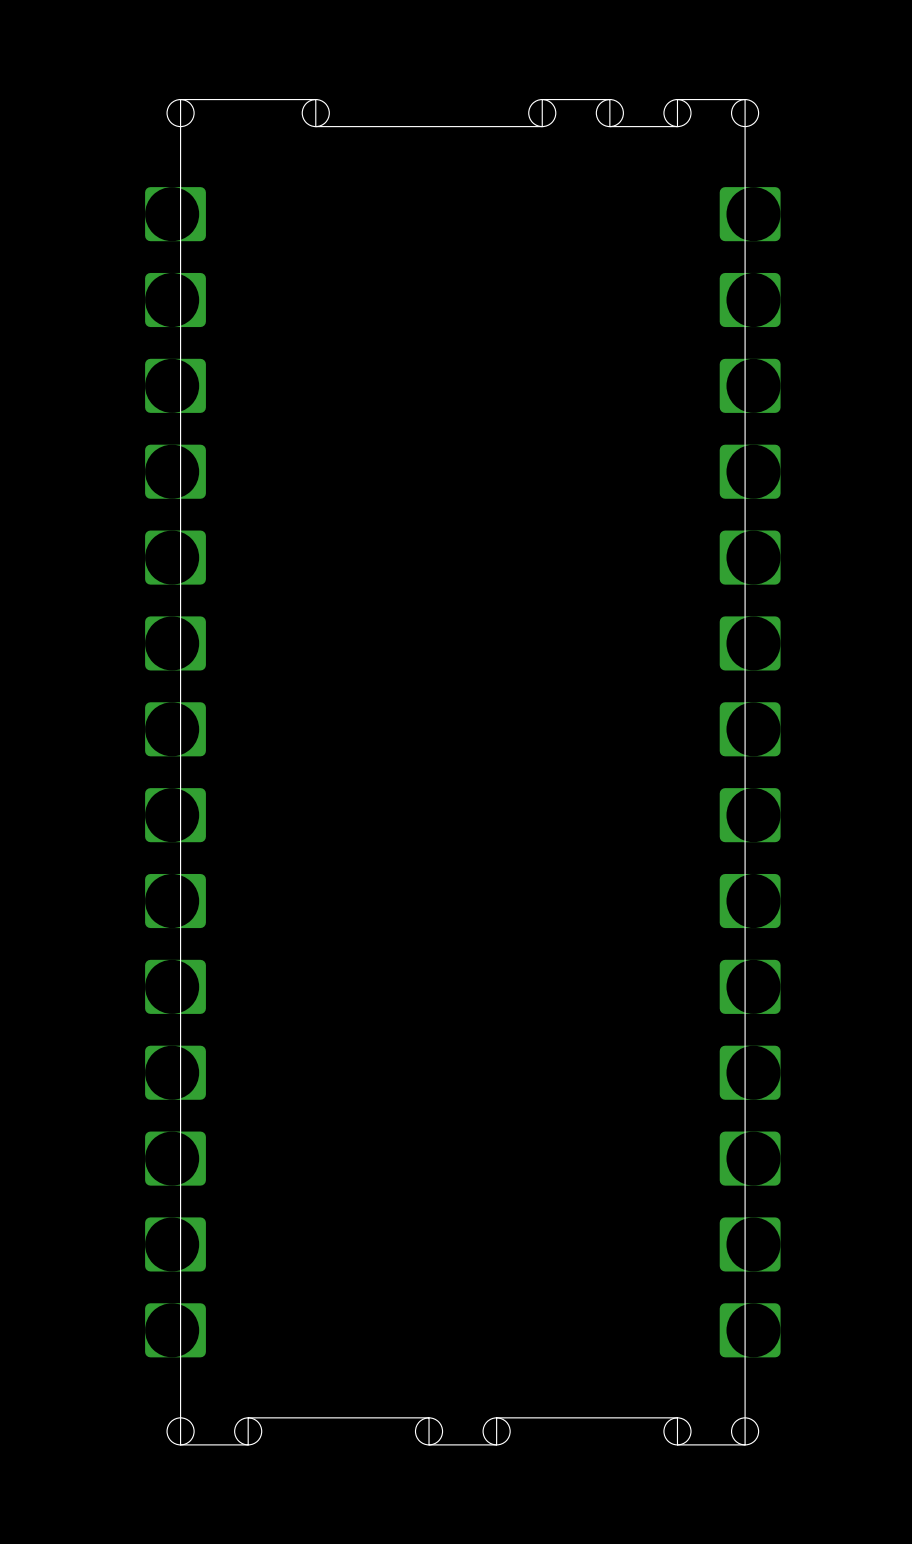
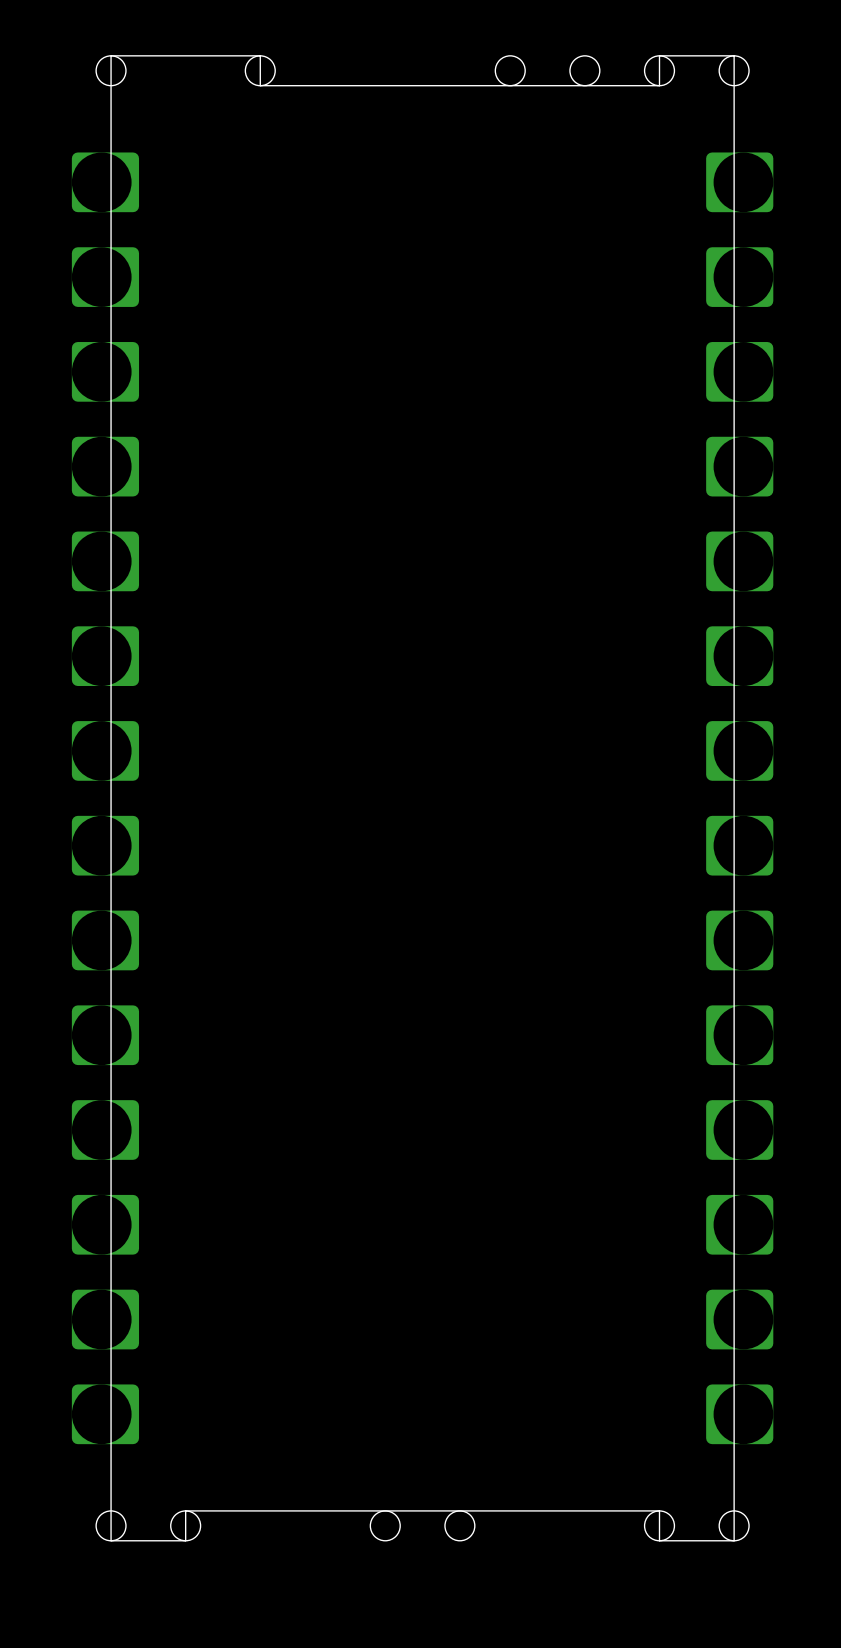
board edge: (542, 126) (542, 99) (609, 99) (609, 126) -> (510, 85) (584, 85)
board edge: (429, 1417) (429, 1444) (496, 1444) (496, 1417) -> (385, 1510) (459, 1510)

